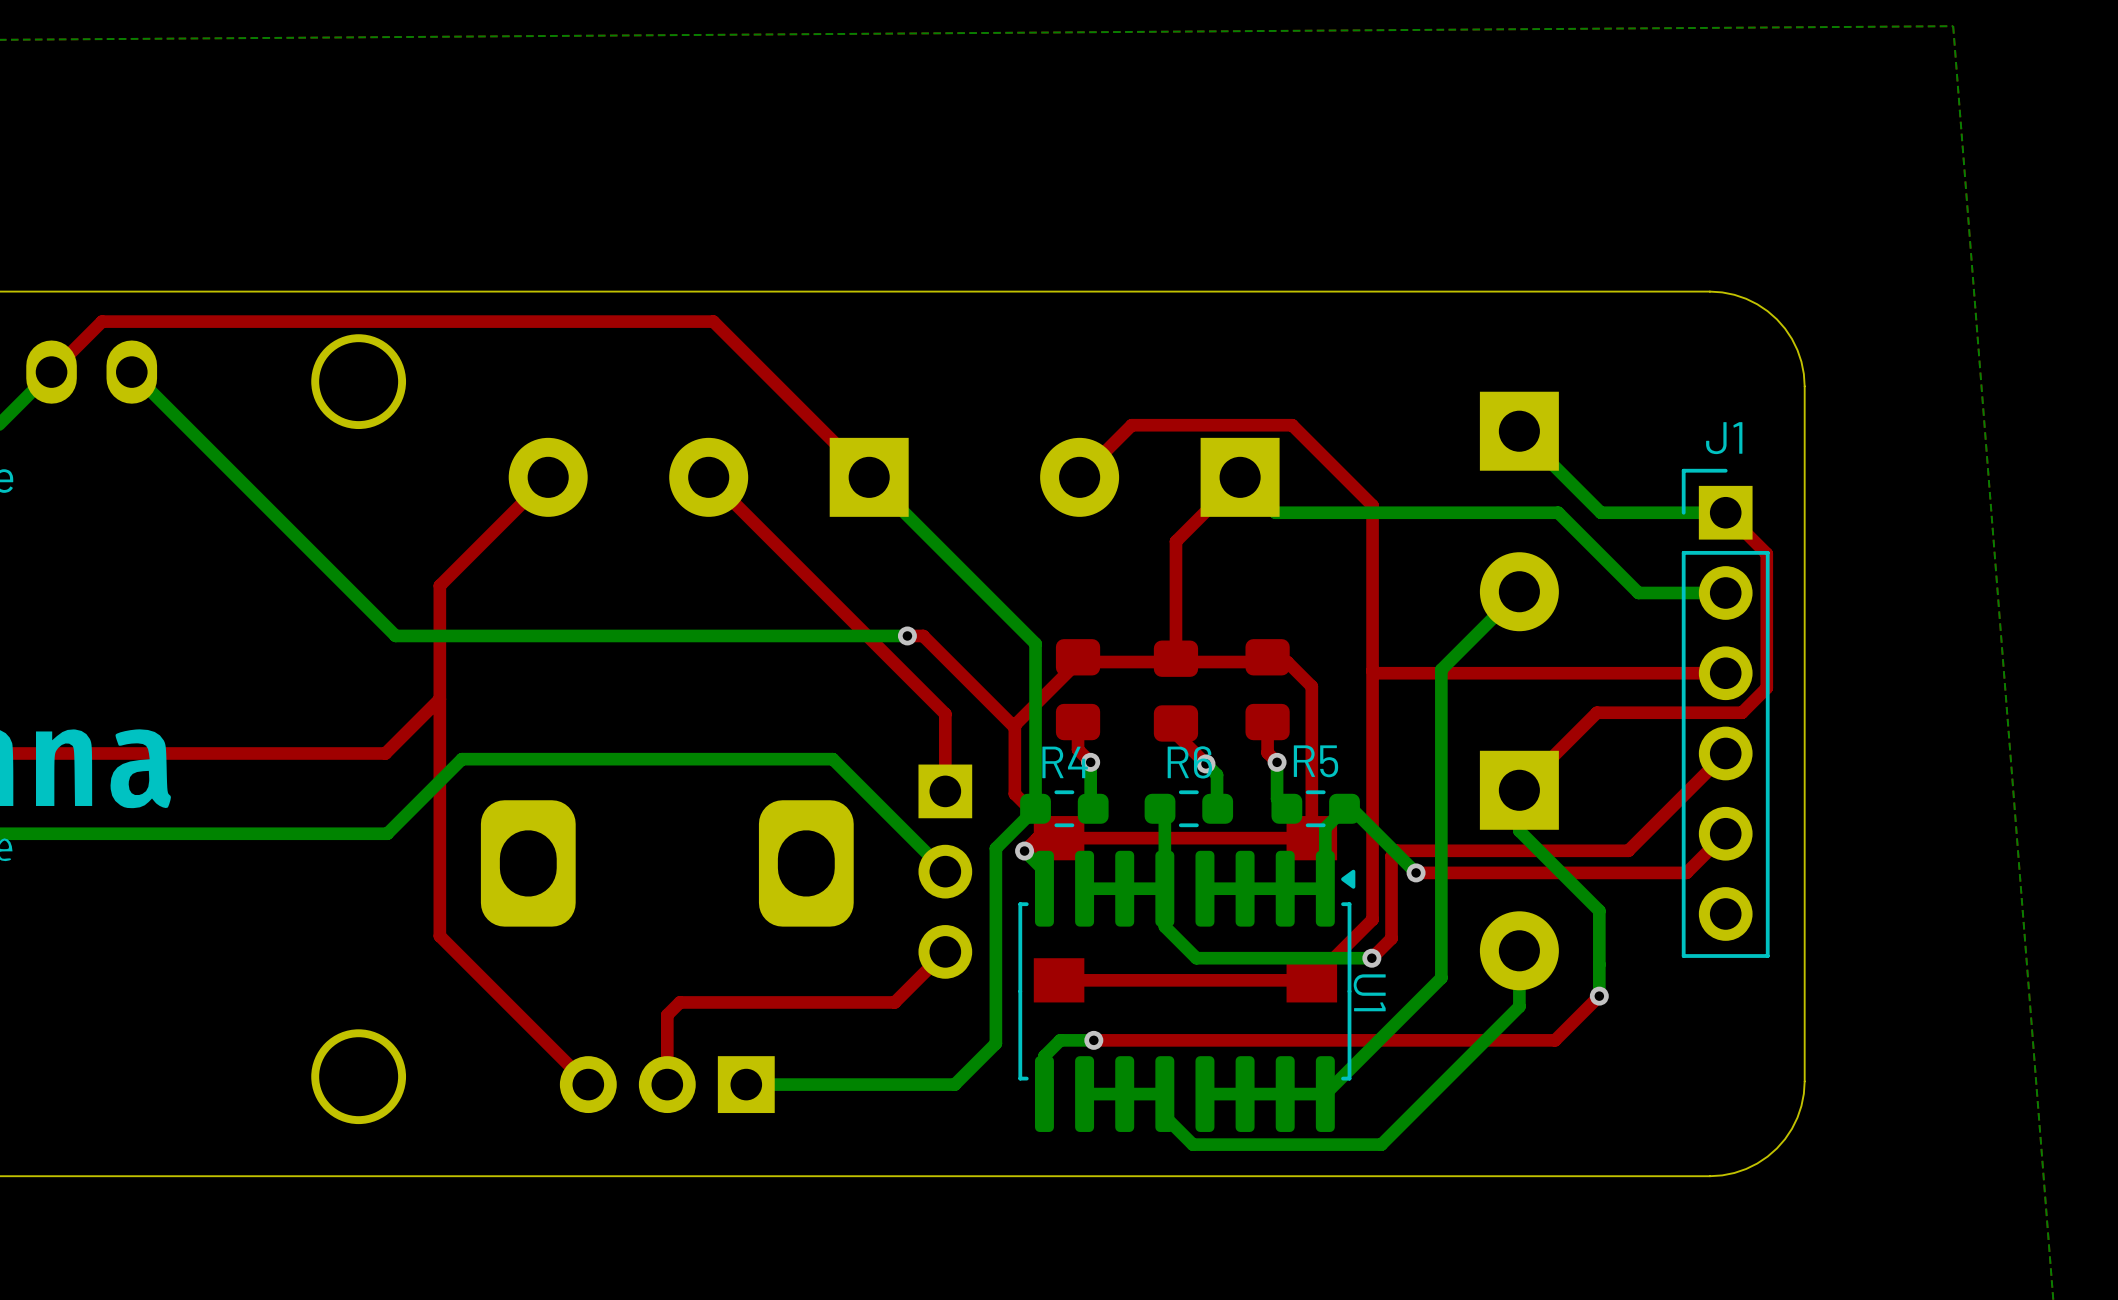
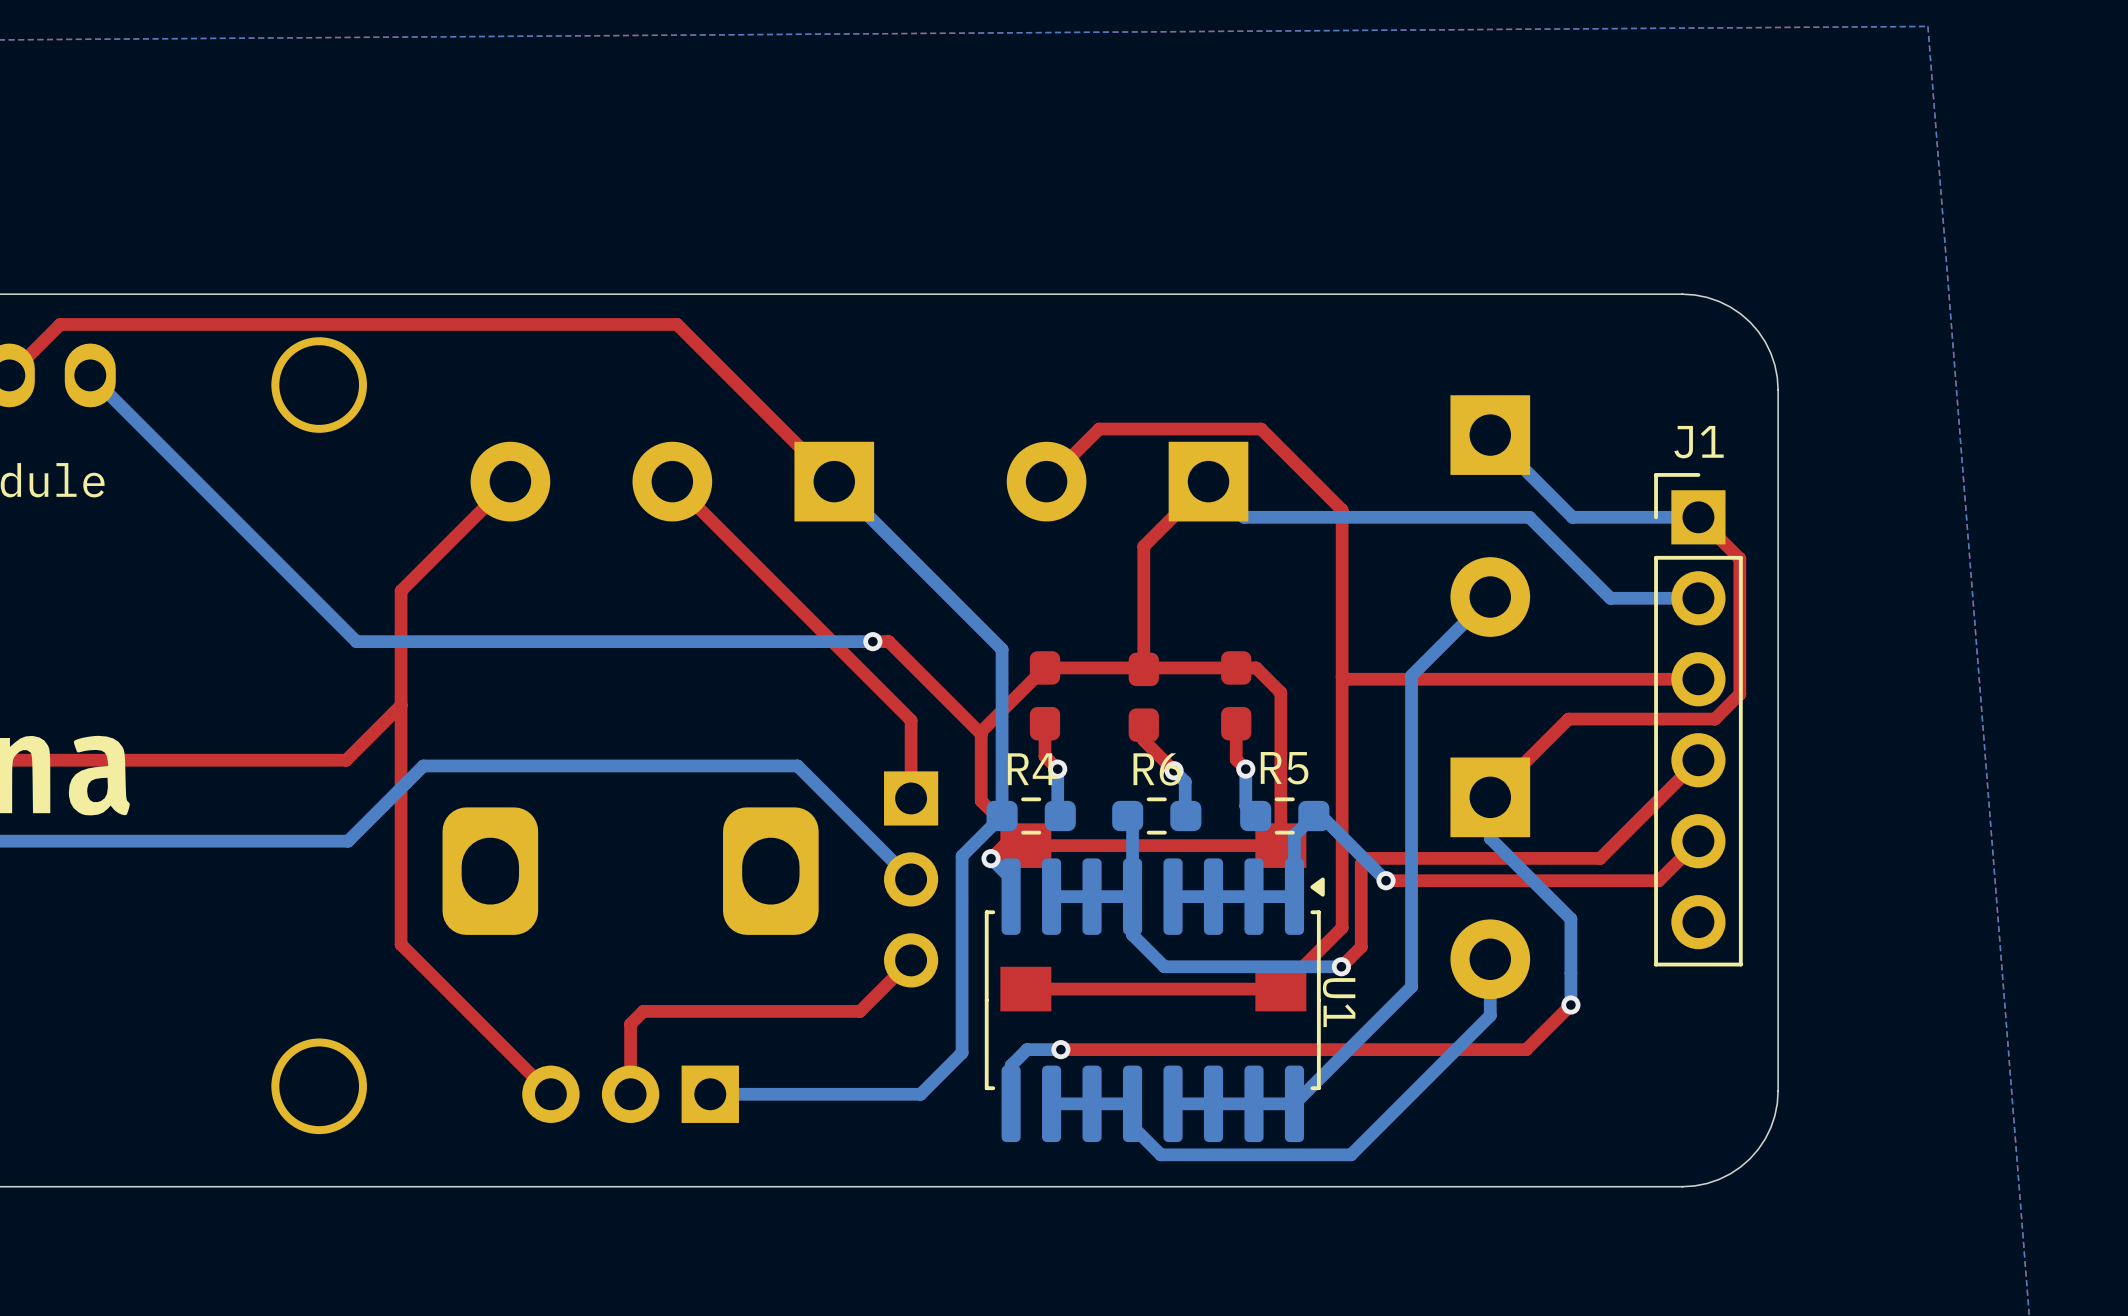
part footprint: [1055, 639, 1101, 741] -> [1029, 651, 1061, 741]
part footprint: [1245, 639, 1290, 741] -> [1221, 651, 1252, 741]
part footprint: [1153, 640, 1199, 742] -> [1128, 652, 1159, 742]

